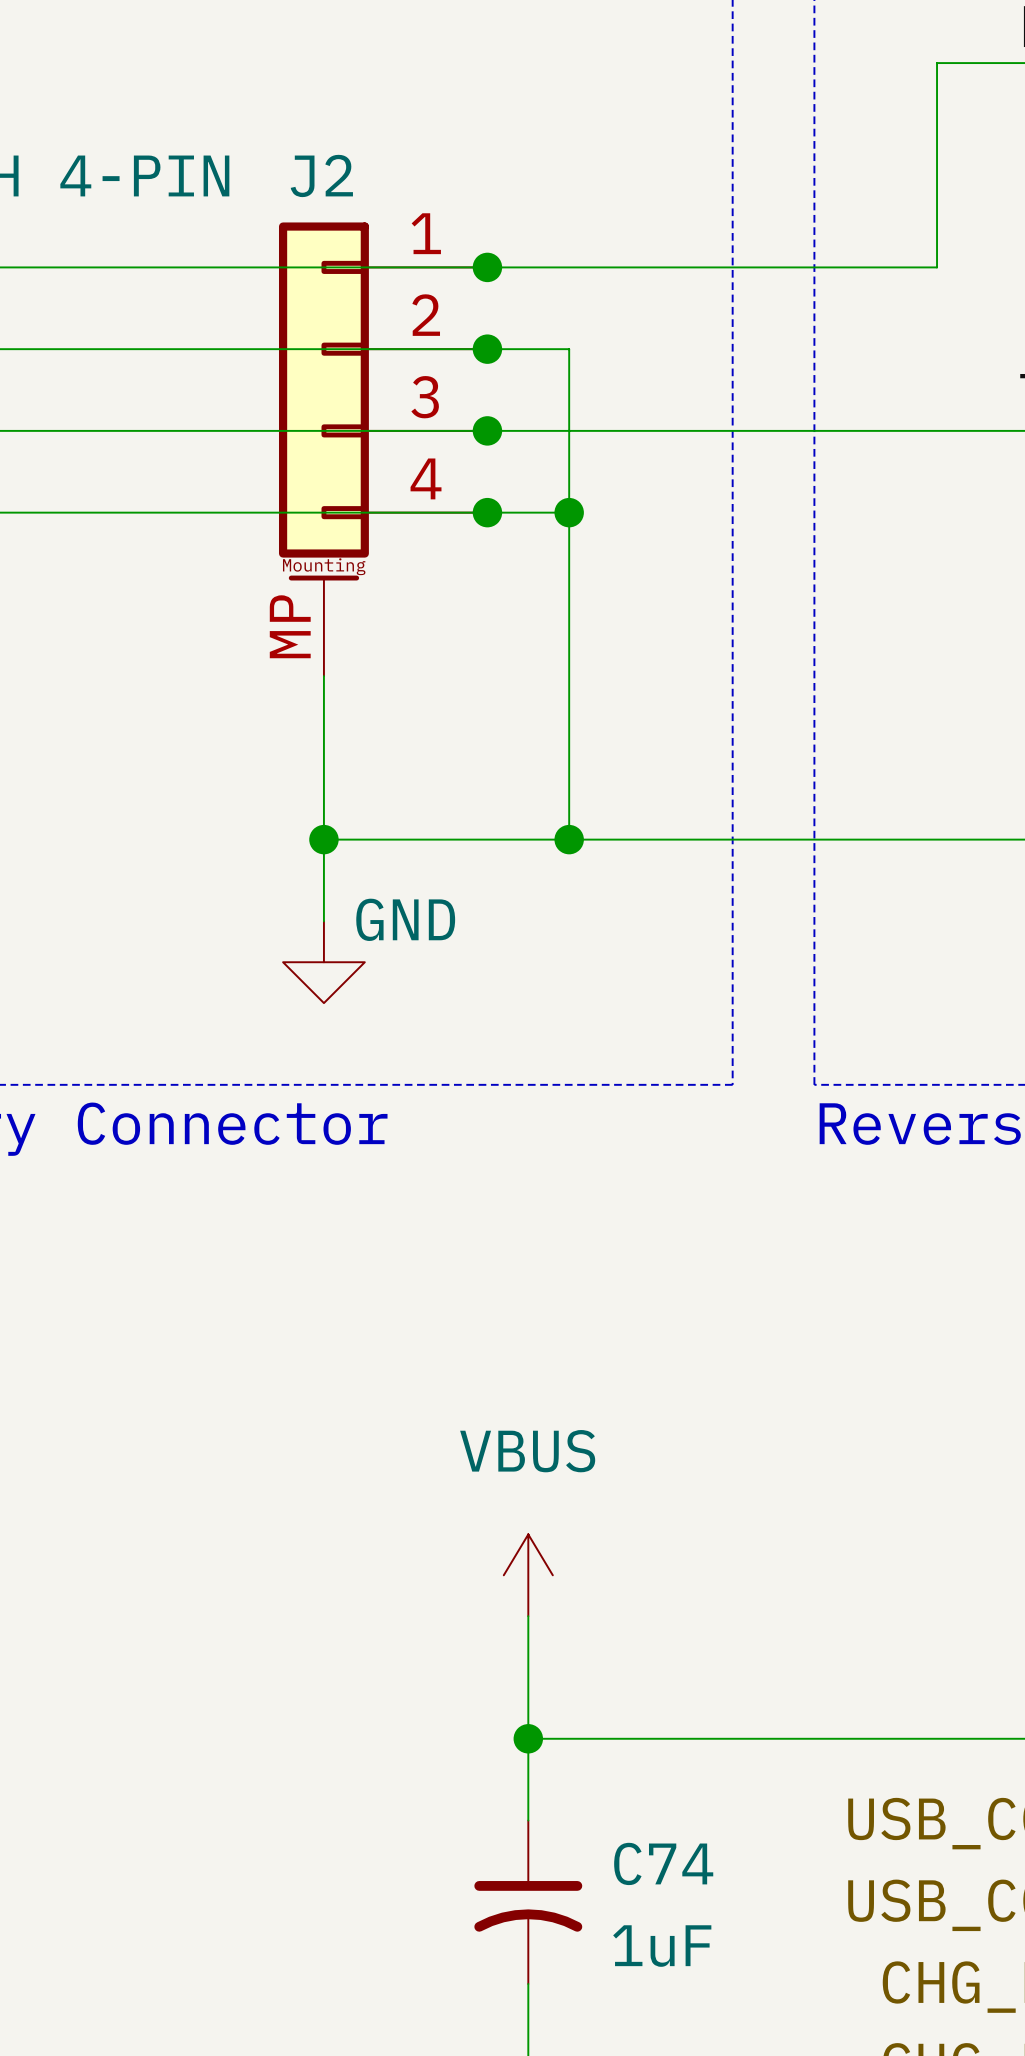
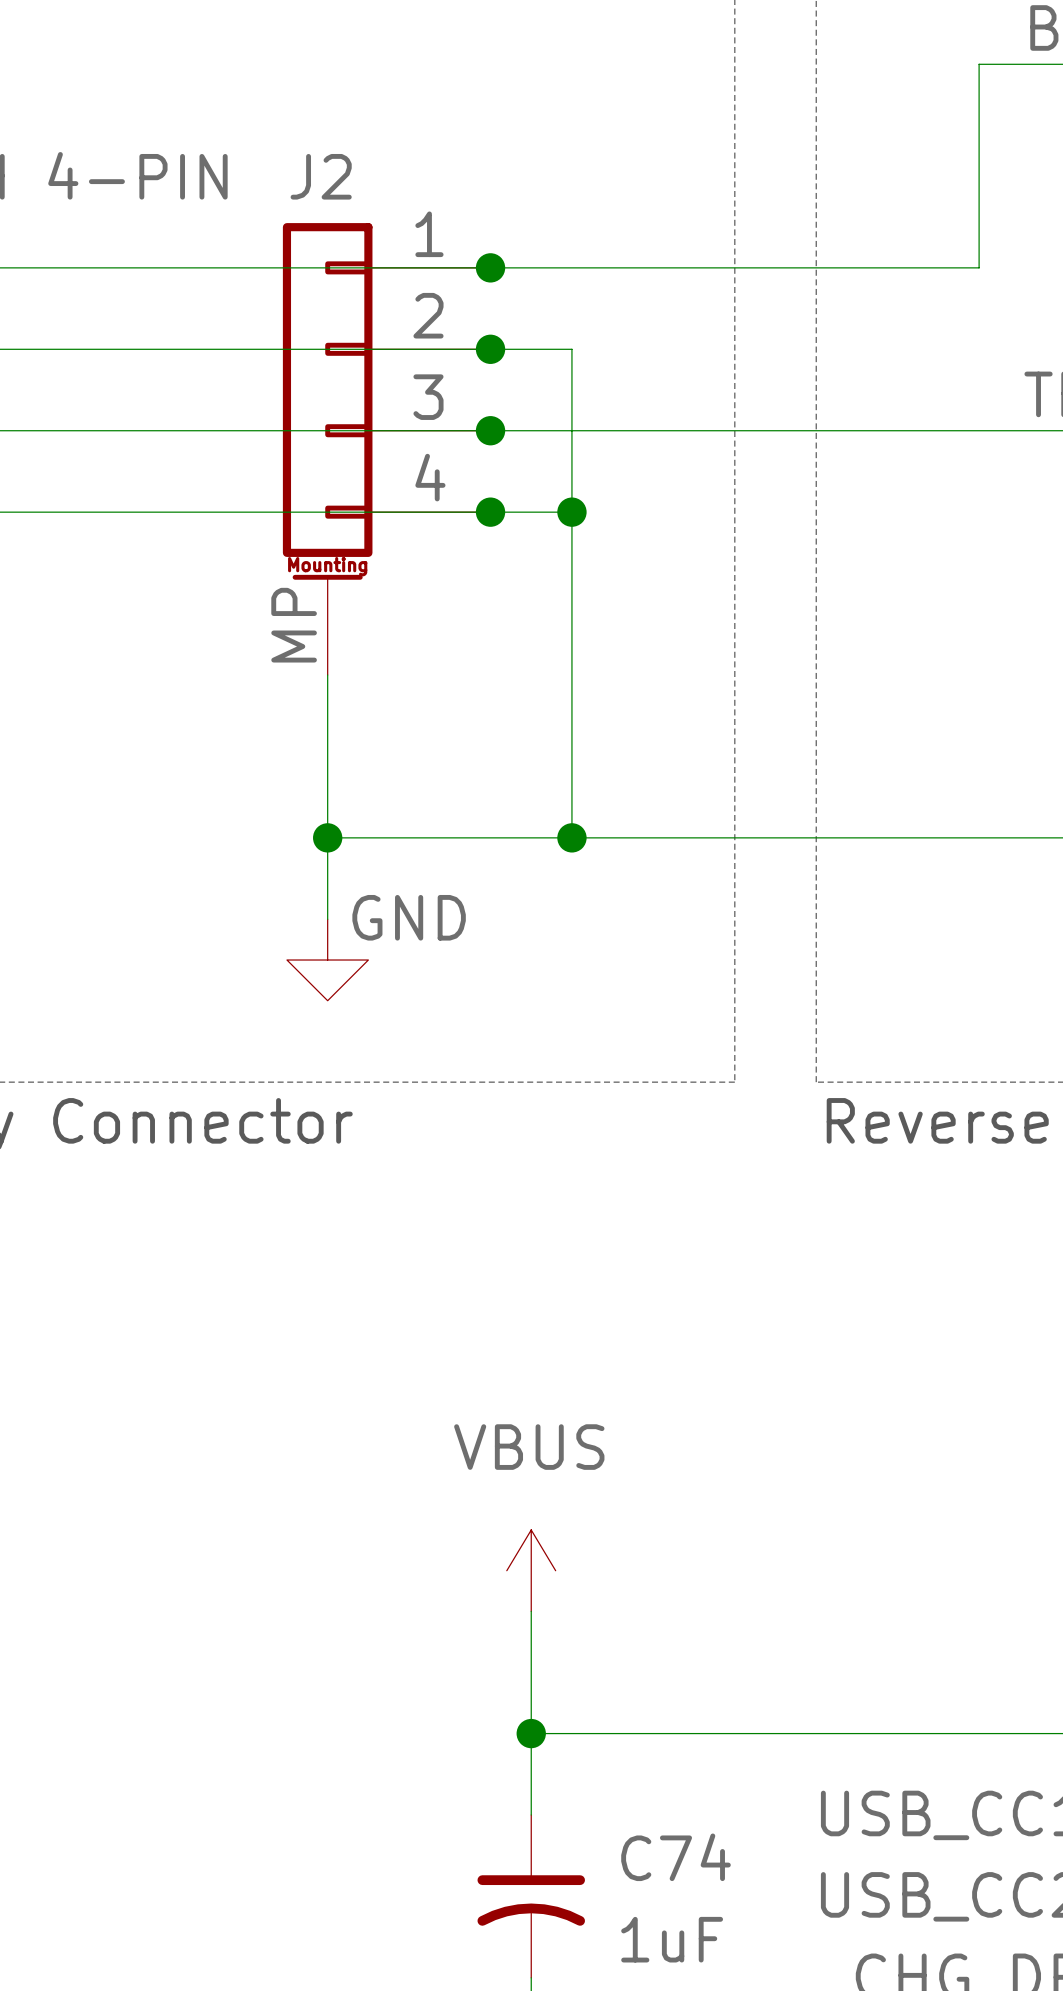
wire: (977, 63) (937, 63) (937, 267) -> (979, 64) (979, 267) (938, 267)

